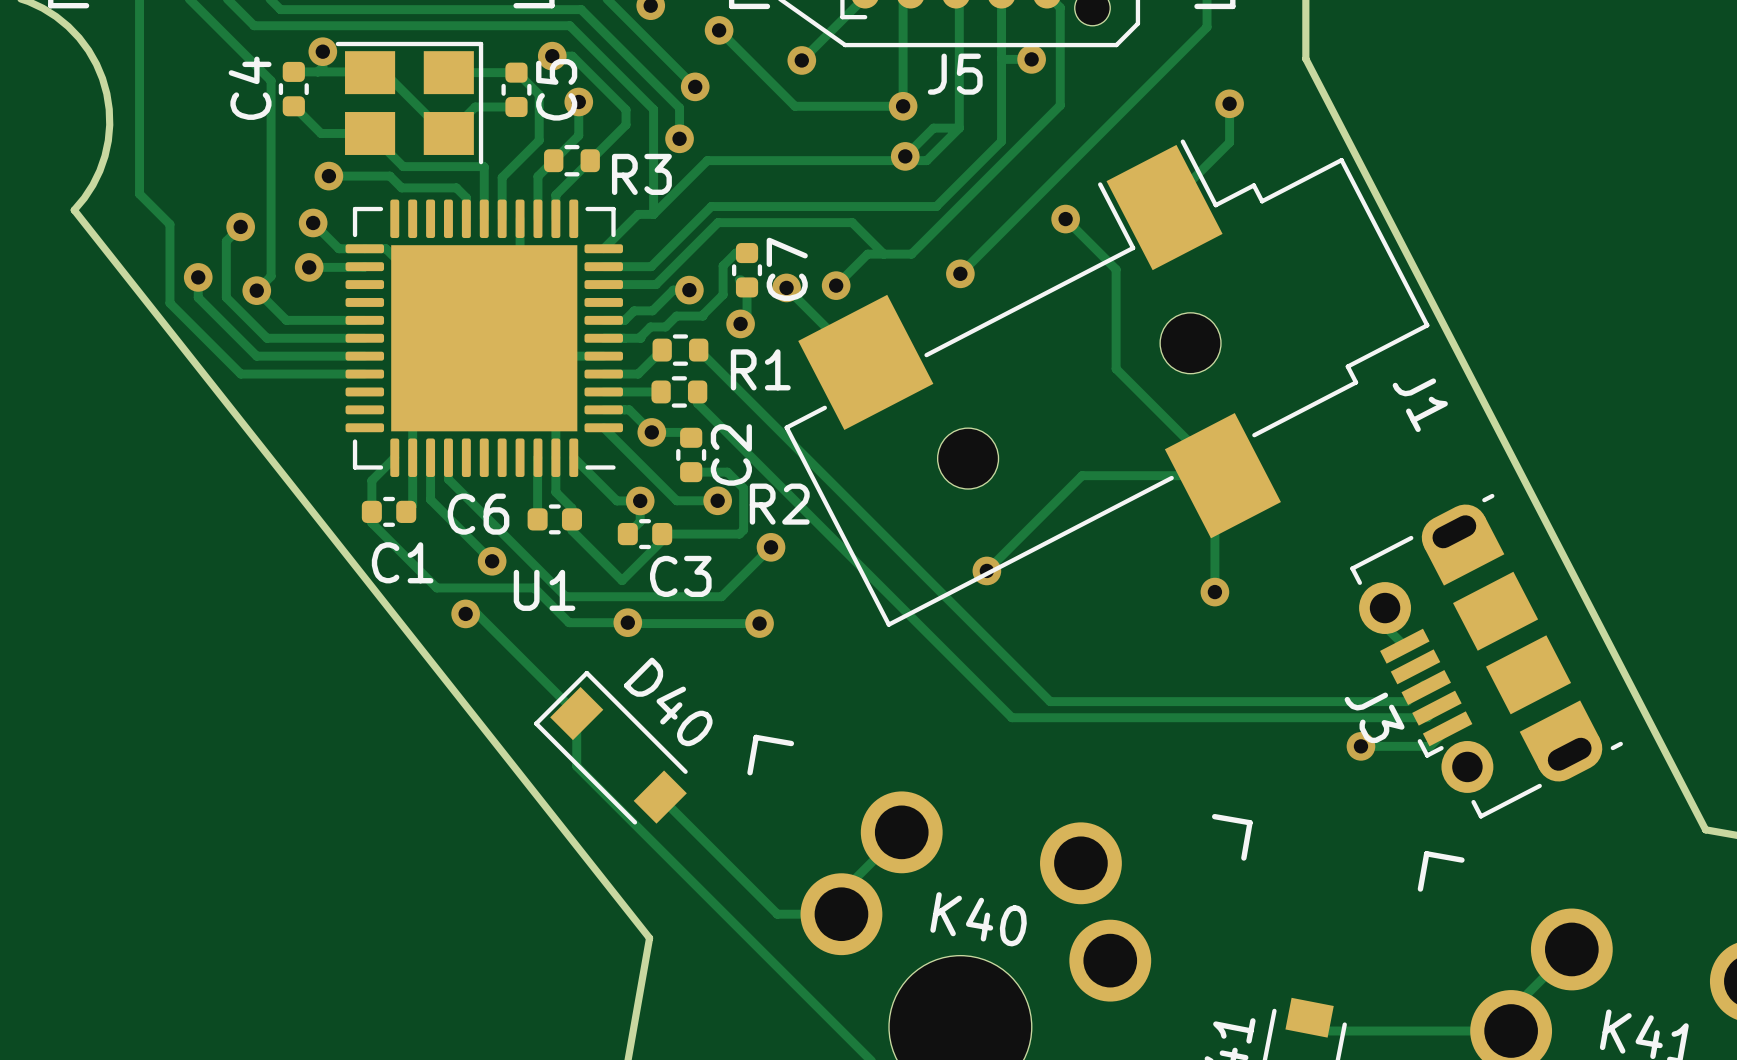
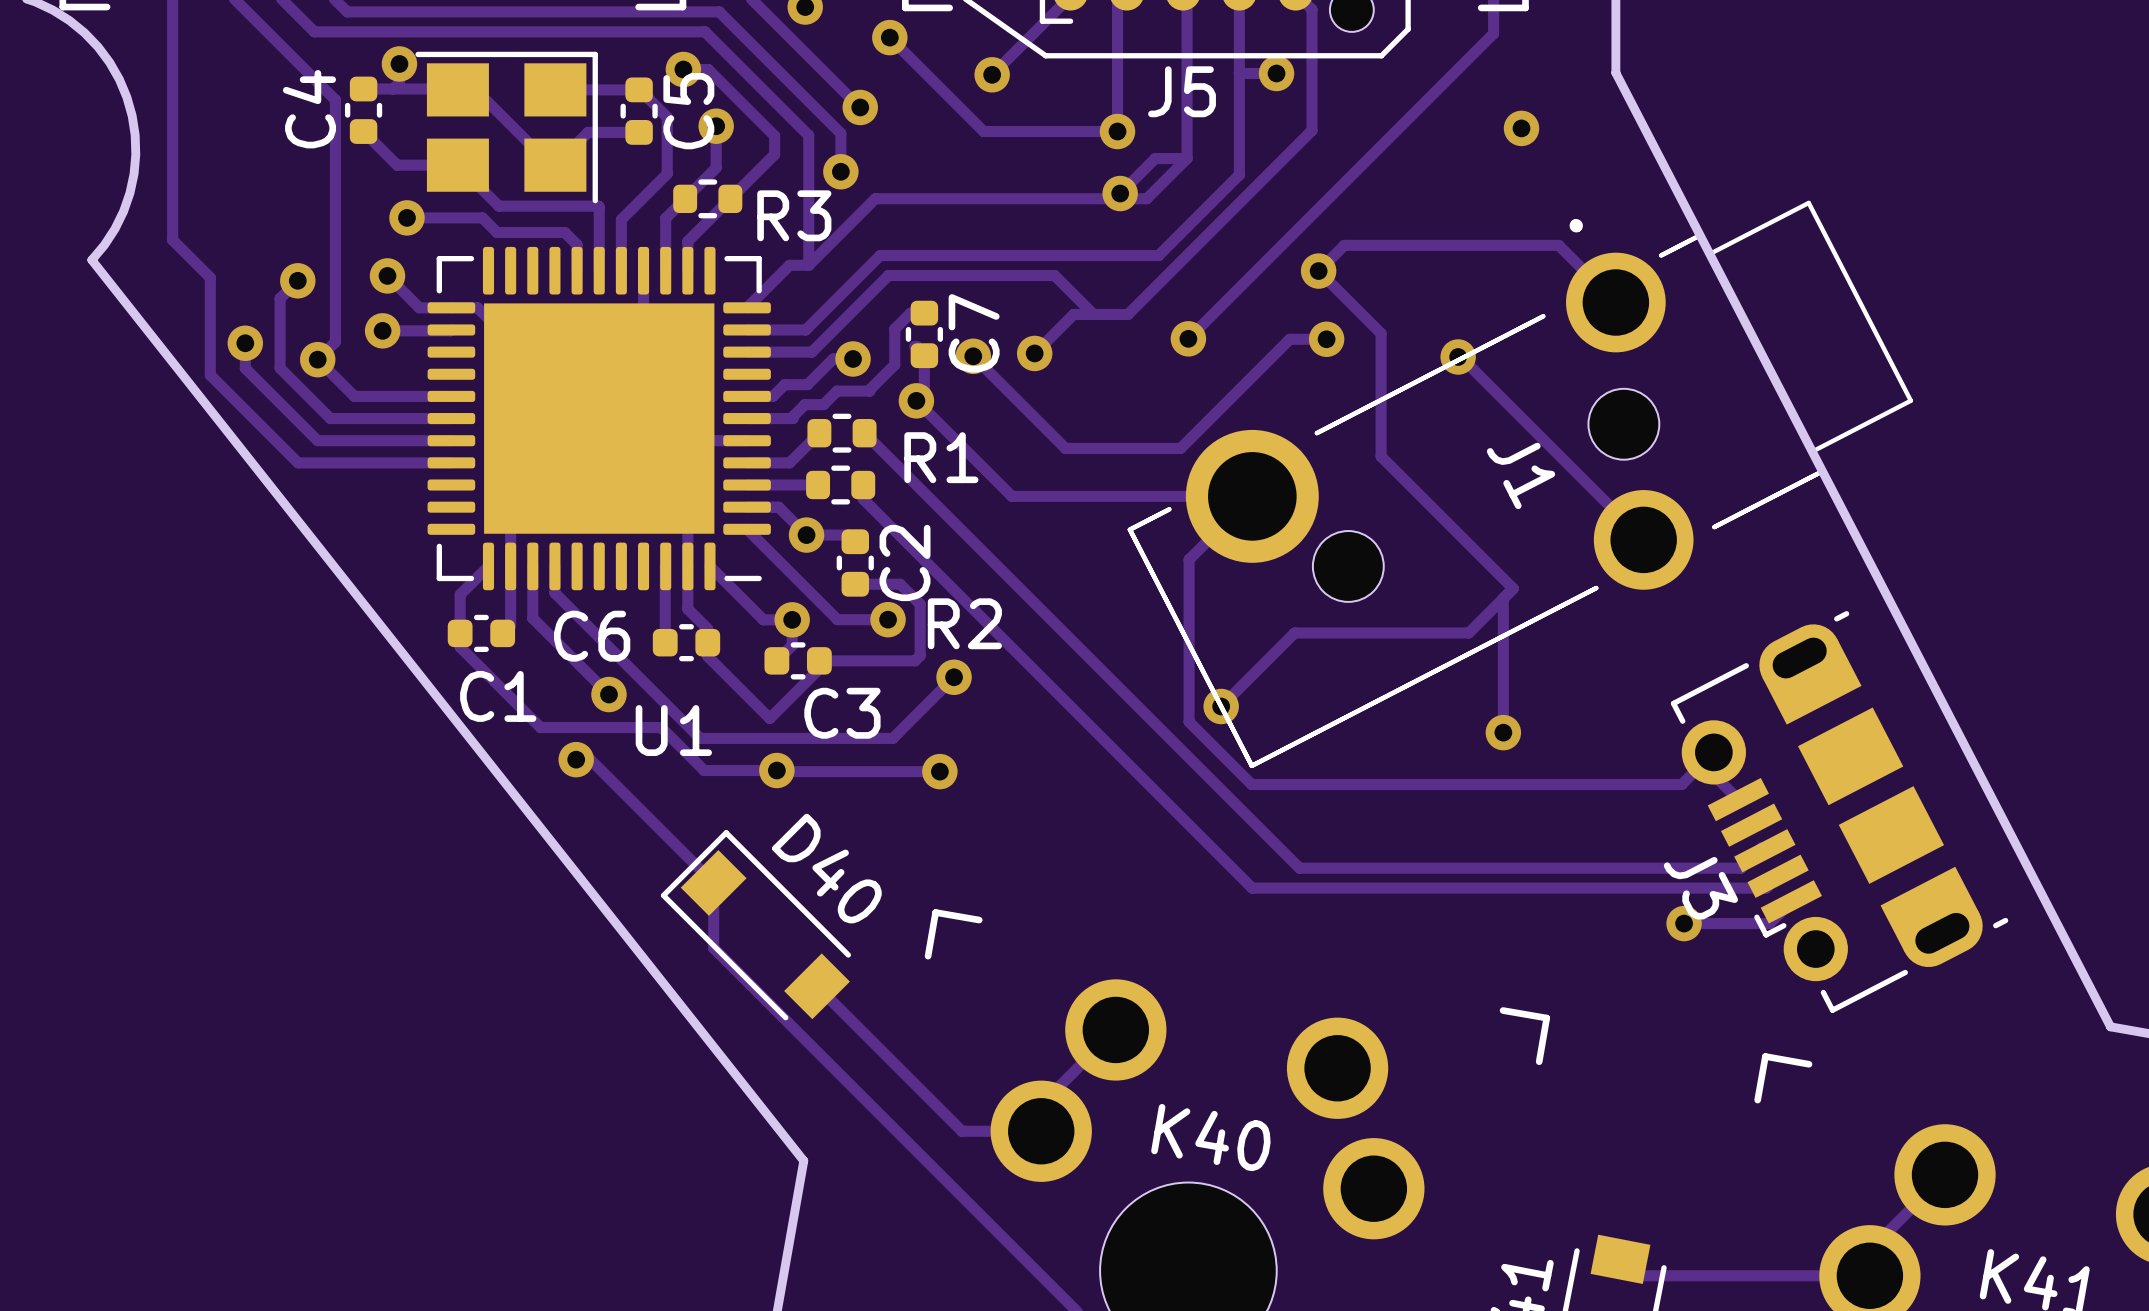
track: (1229, 103) (1229, 142) (1164, 207) -> none
J1 footprint: [784, 139, 1430, 627] -> [1127, 200, 1914, 769]
track: none -> (1318, 271) (1344, 245) (1558, 245) (1615, 302)
track: none -> (1326, 339) (1289, 339) (1180, 448) (1071, 448)
via: none -> (1326, 339)
track: none -> (1458, 356) (1460, 356) (1643, 539)
via: none -> (1458, 356)
track: none -> (916, 400) (1011, 496) (1252, 496) (1189, 559) (1189, 721) (1251, 784) (1681, 784) (1713, 752)
J1 name position: J1 (1420, 405) -> J1 (1521, 475)
track: (1222, 475) (1082, 475) (1046, 511) -> (1503, 598) (1468, 632) (1294, 632)

